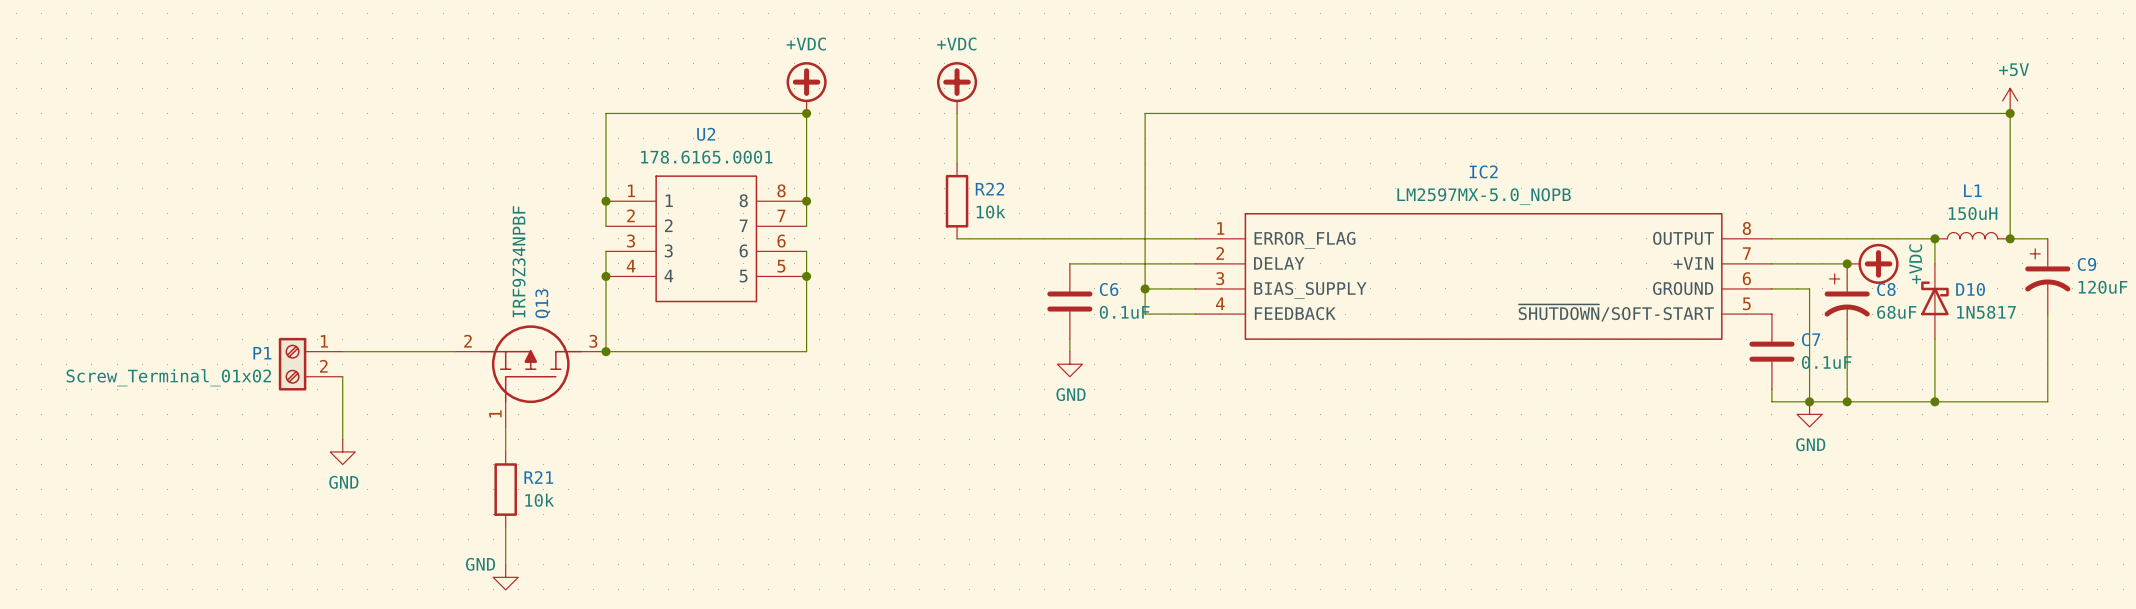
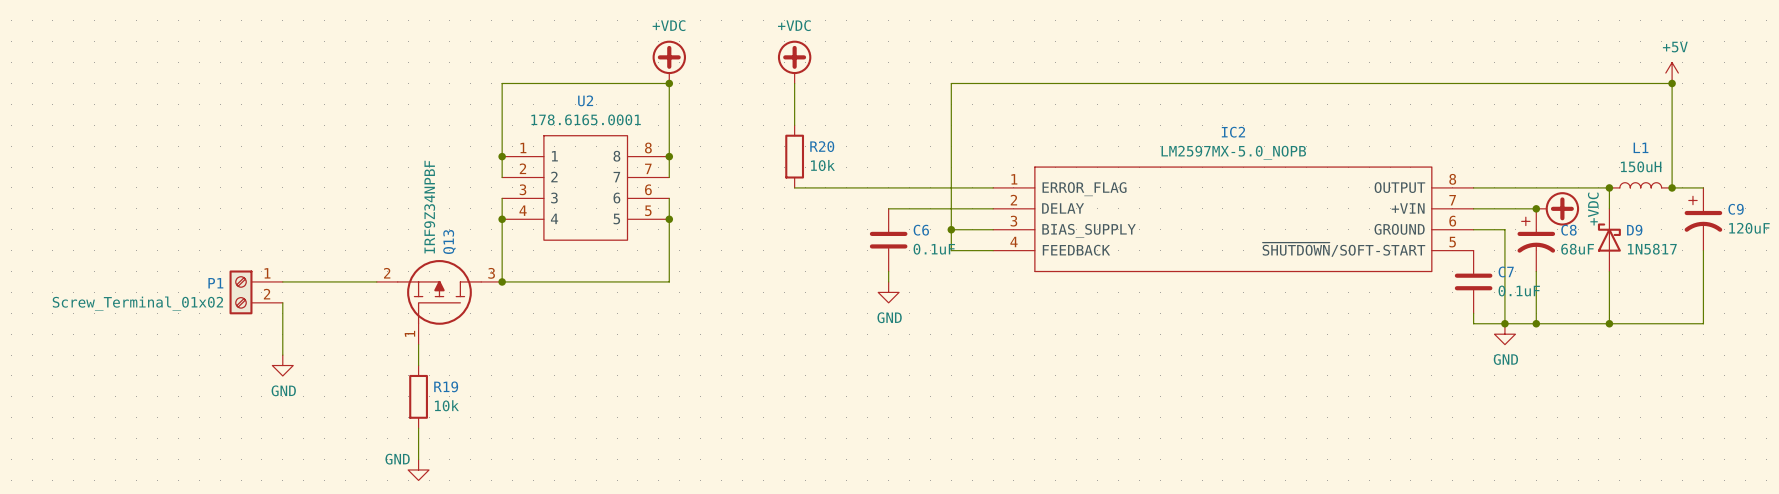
R22 name: R22 (989, 189) -> R20 (822, 146)
D10 name: D10 (1970, 289) -> D9 (1634, 230)
R21 name: R21 (538, 477) -> R19 (446, 386)

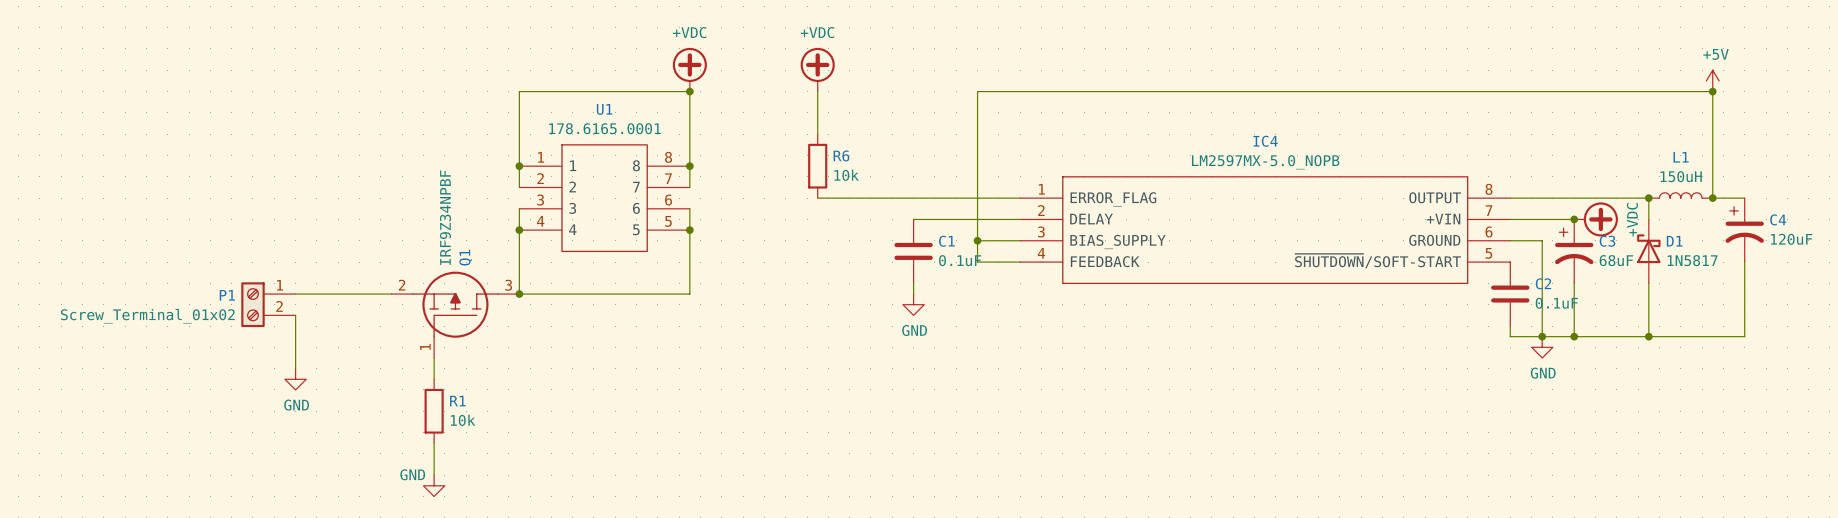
U2 name: U2 (585, 100) -> U1 (604, 109)
IC2 name: IC2 (1233, 132) -> IC4 (1265, 141)
R20 name: R20 (822, 146) -> R6 (841, 155)
C9 name: C9 (1736, 209) -> C4 (1778, 219)
C6 name: C6 (921, 230) -> C1 (946, 241)
C8 name: C8 (1568, 230) -> C3 (1607, 241)
D9 name: D9 (1634, 230) -> D1 (1674, 241)
Q13 name: Q13 (449, 241) -> Q1 (465, 257)
C7 name: C7 (1506, 271) -> C2 (1543, 283)
R19 name: R19 (446, 386) -> R1 (457, 401)

